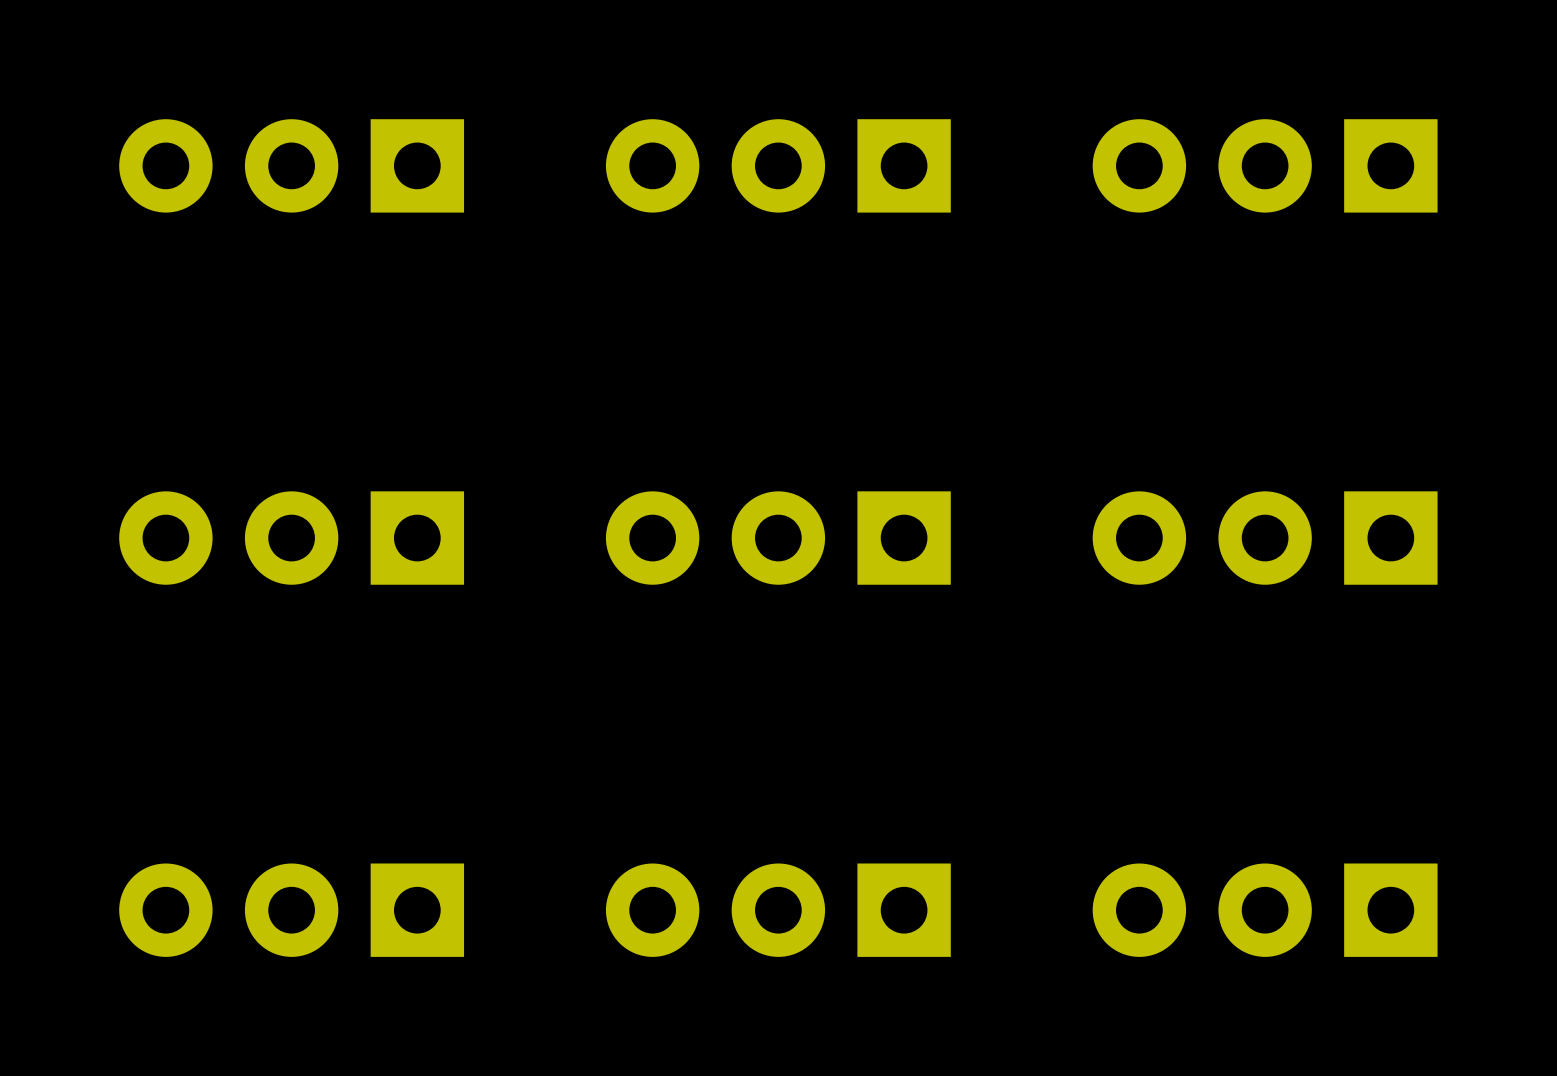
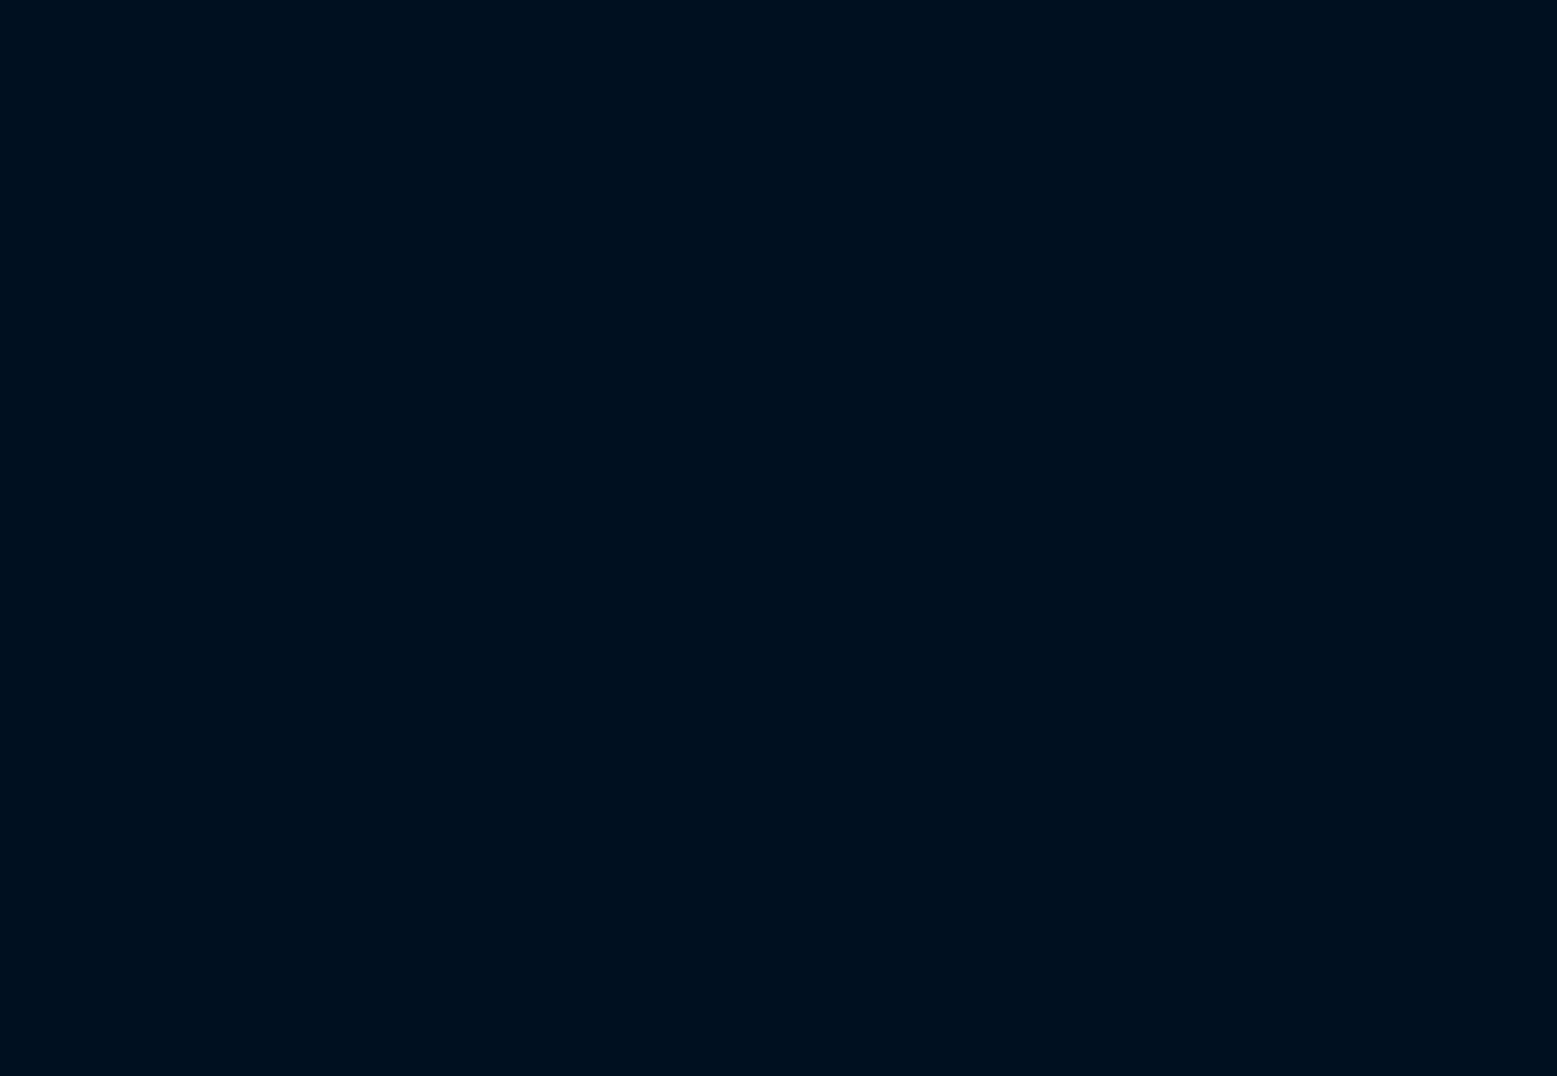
part: (291, 165) -> none
part: (778, 165) -> none
part: (1265, 165) -> none
part: (291, 538) -> none
part: (778, 538) -> none
part: (1265, 538) -> none
part: (291, 910) -> none
part: (778, 910) -> none
part: (1265, 910) -> none

